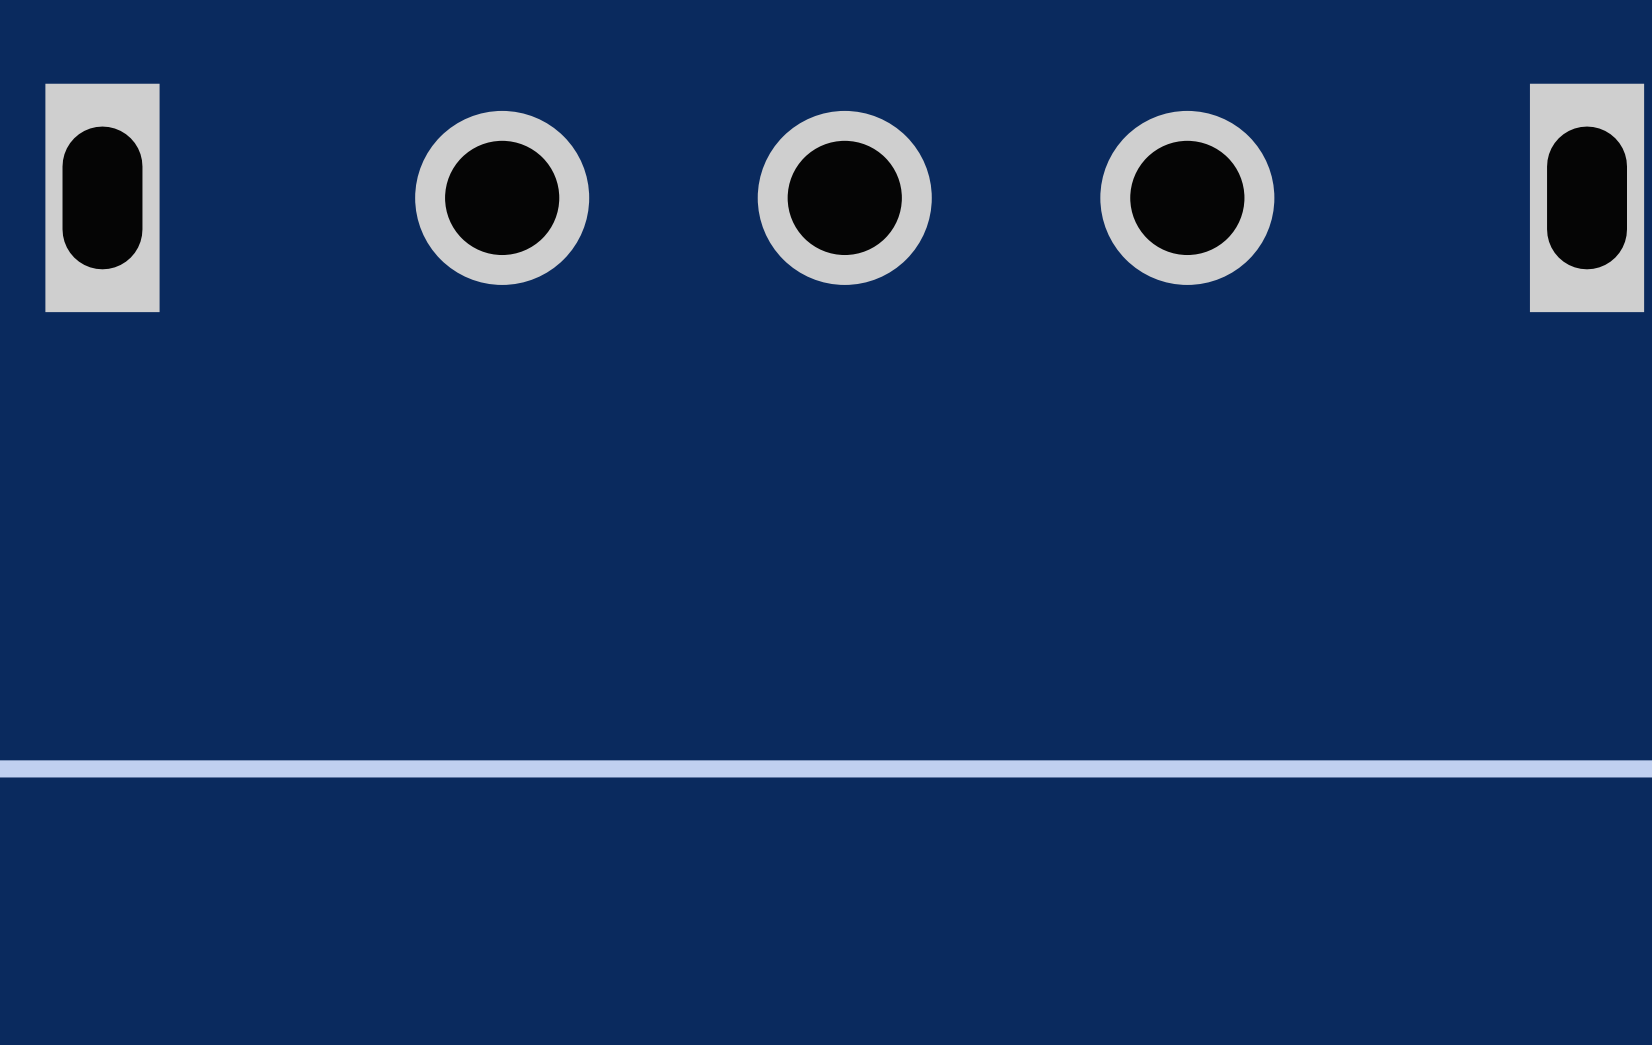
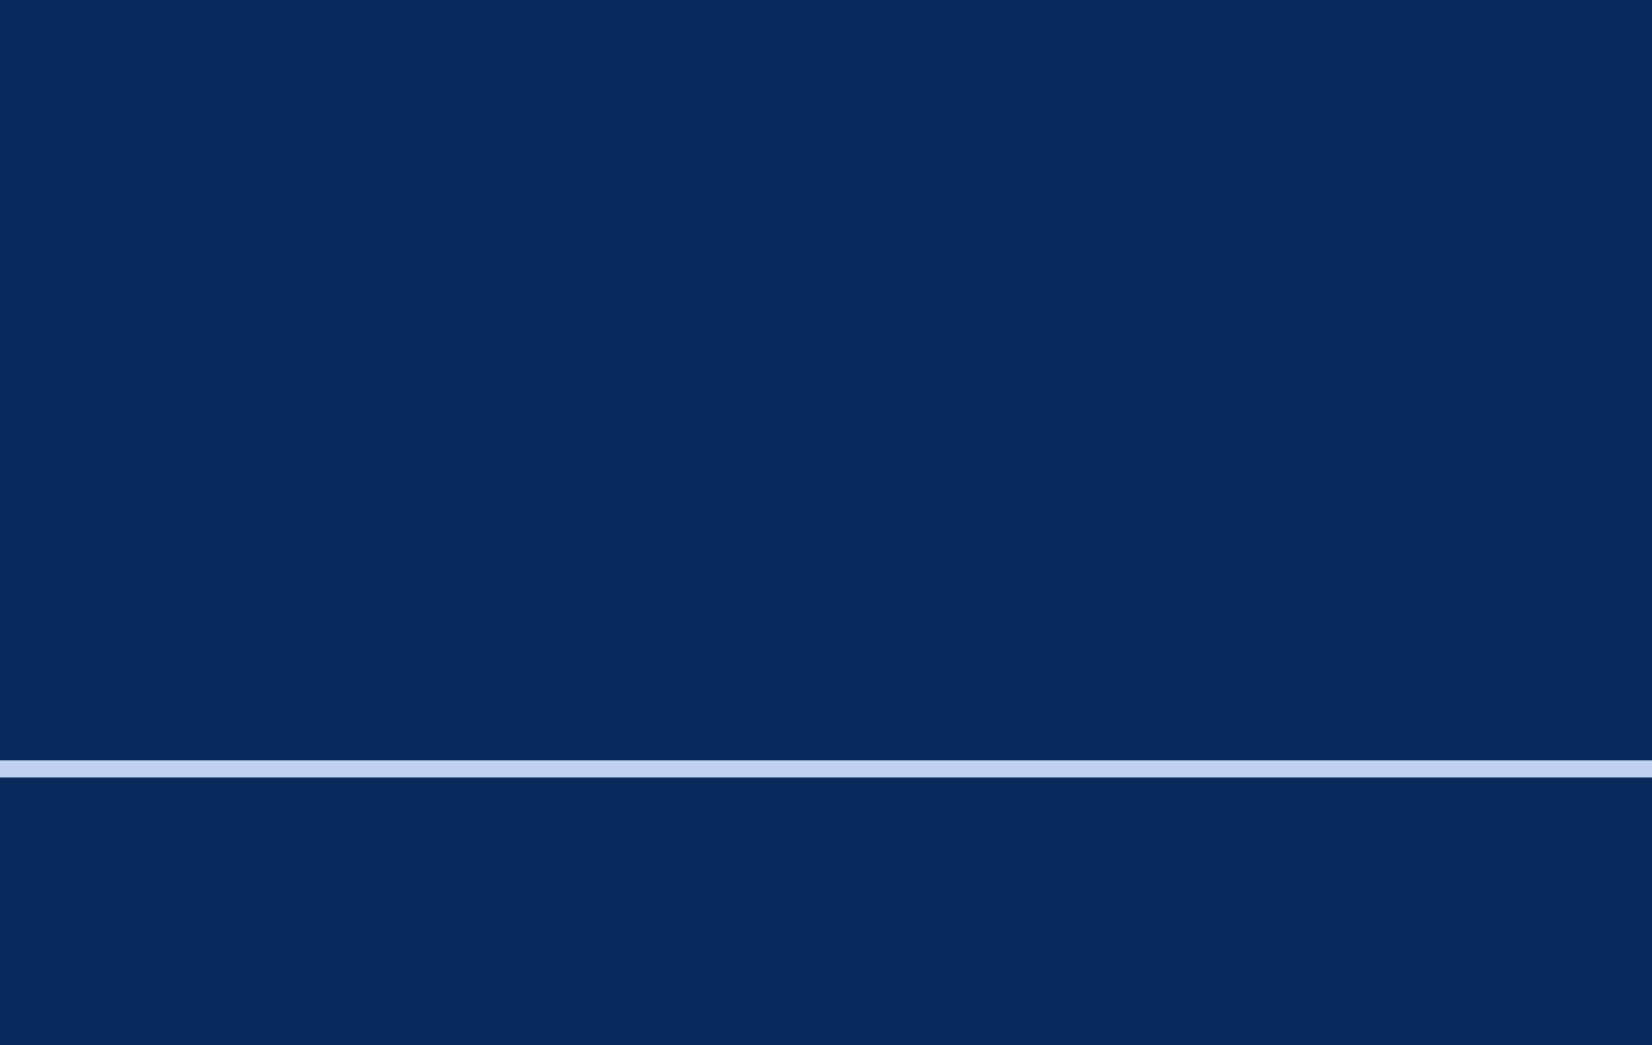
part: (844, 197) -> none

